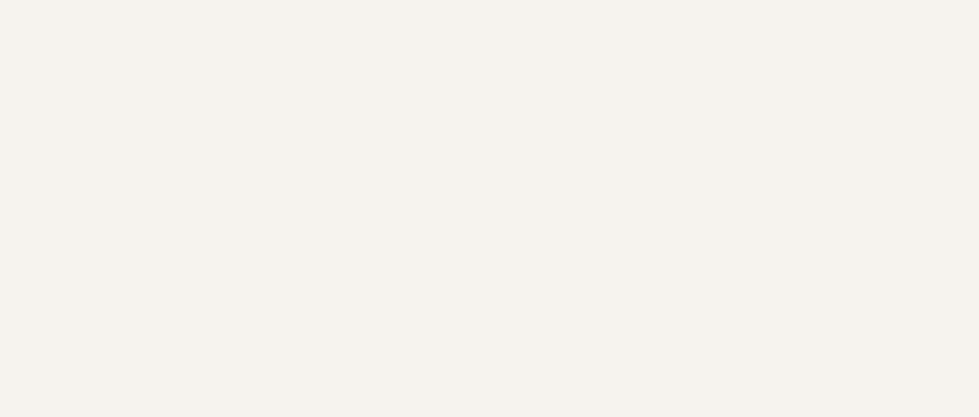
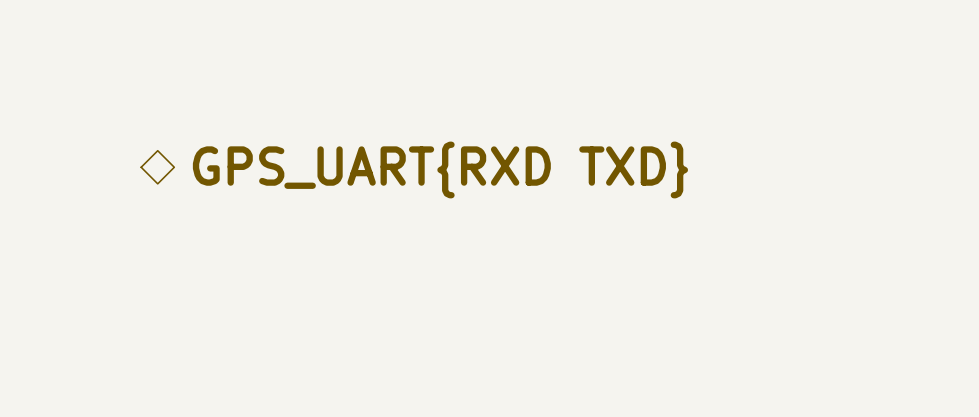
hierarchical label: none -> GPS_UART{RXD TXD} (440, 169)

